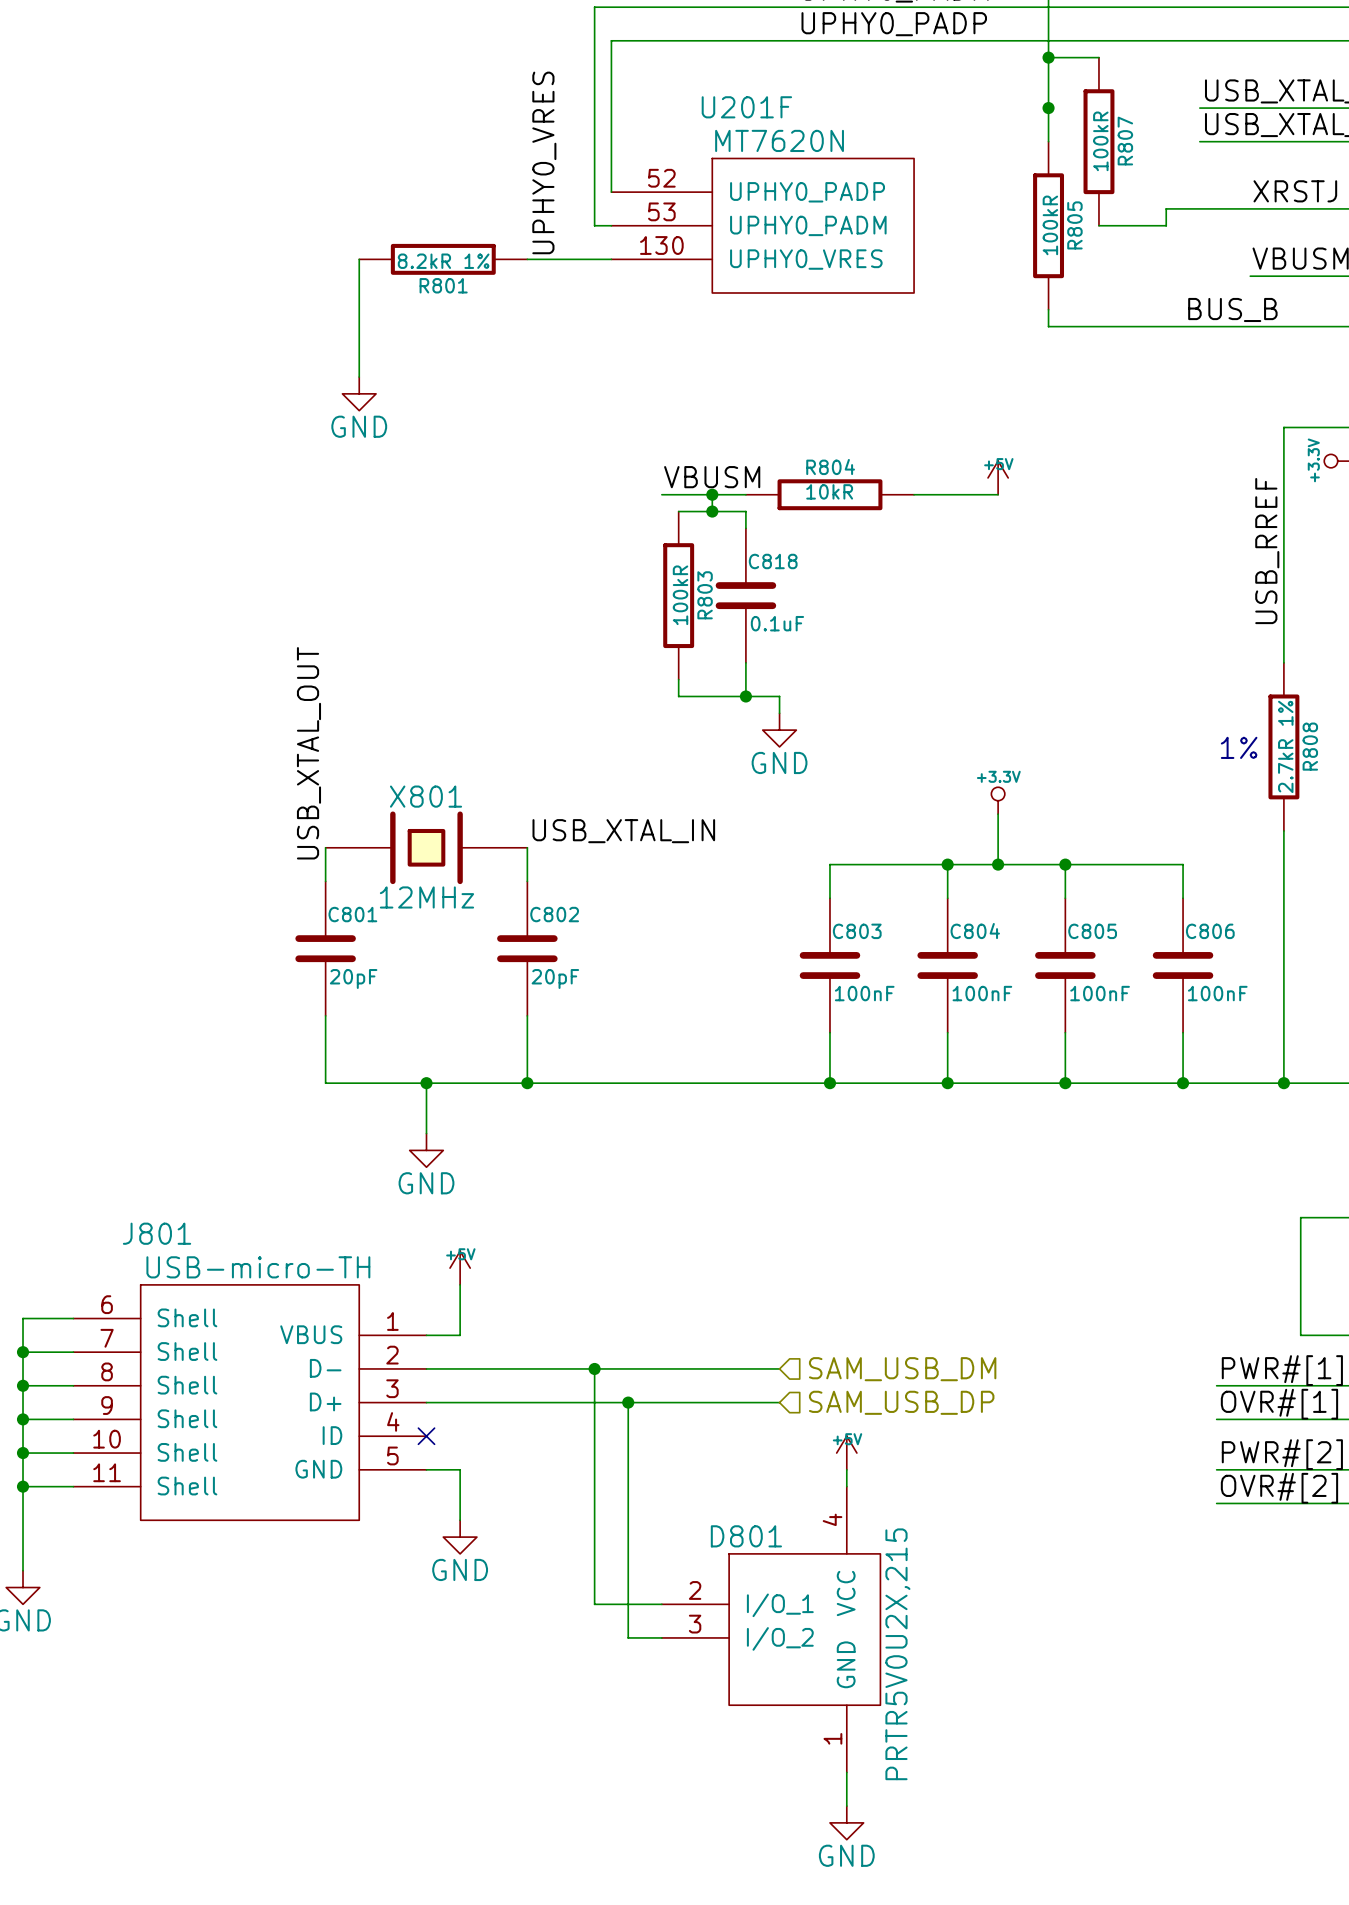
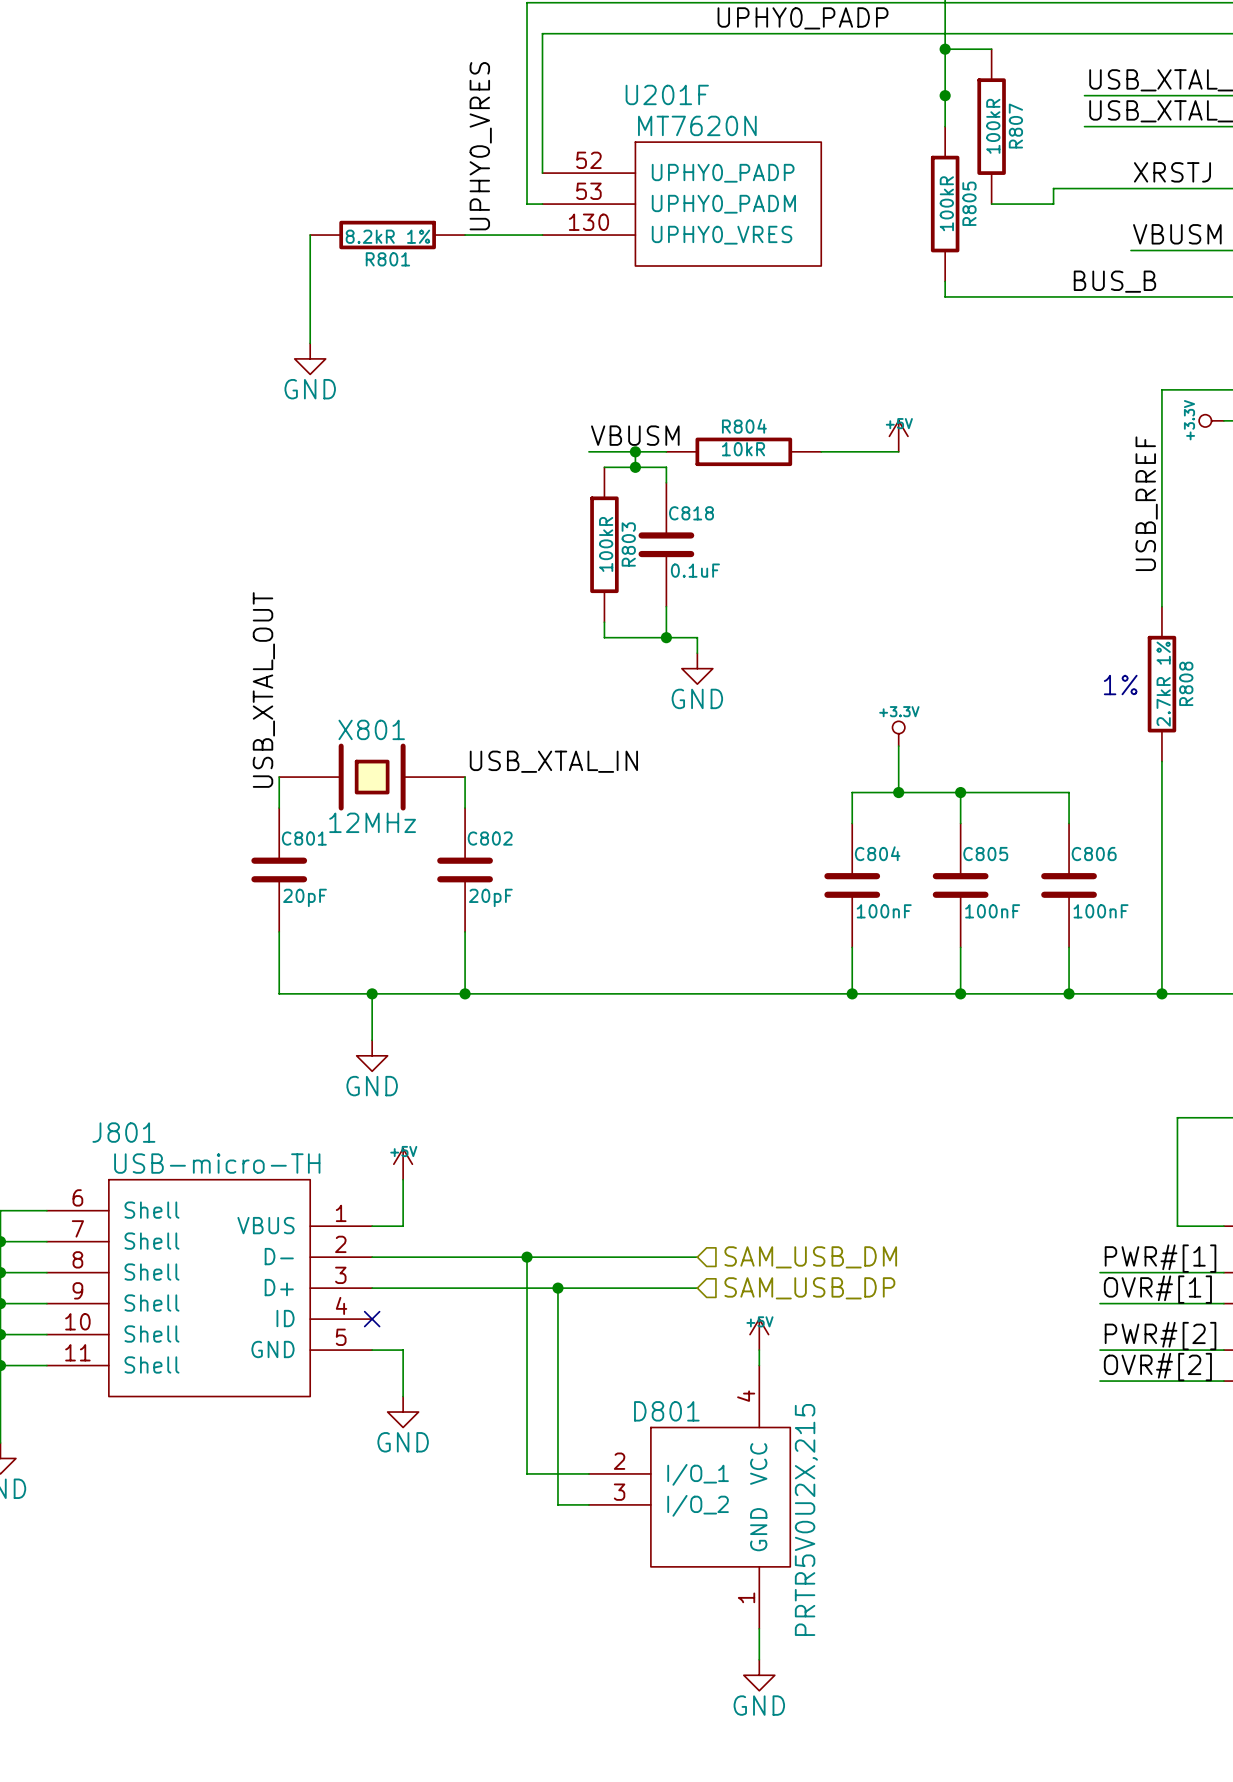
wire: (947, 864) (829, 864) (829, 898) -> none
junction: (947, 864) -> none
C803: 100nF (829, 965) -> none
wire: (829, 1032) (829, 1083) -> none
junction: (829, 1083) -> none

